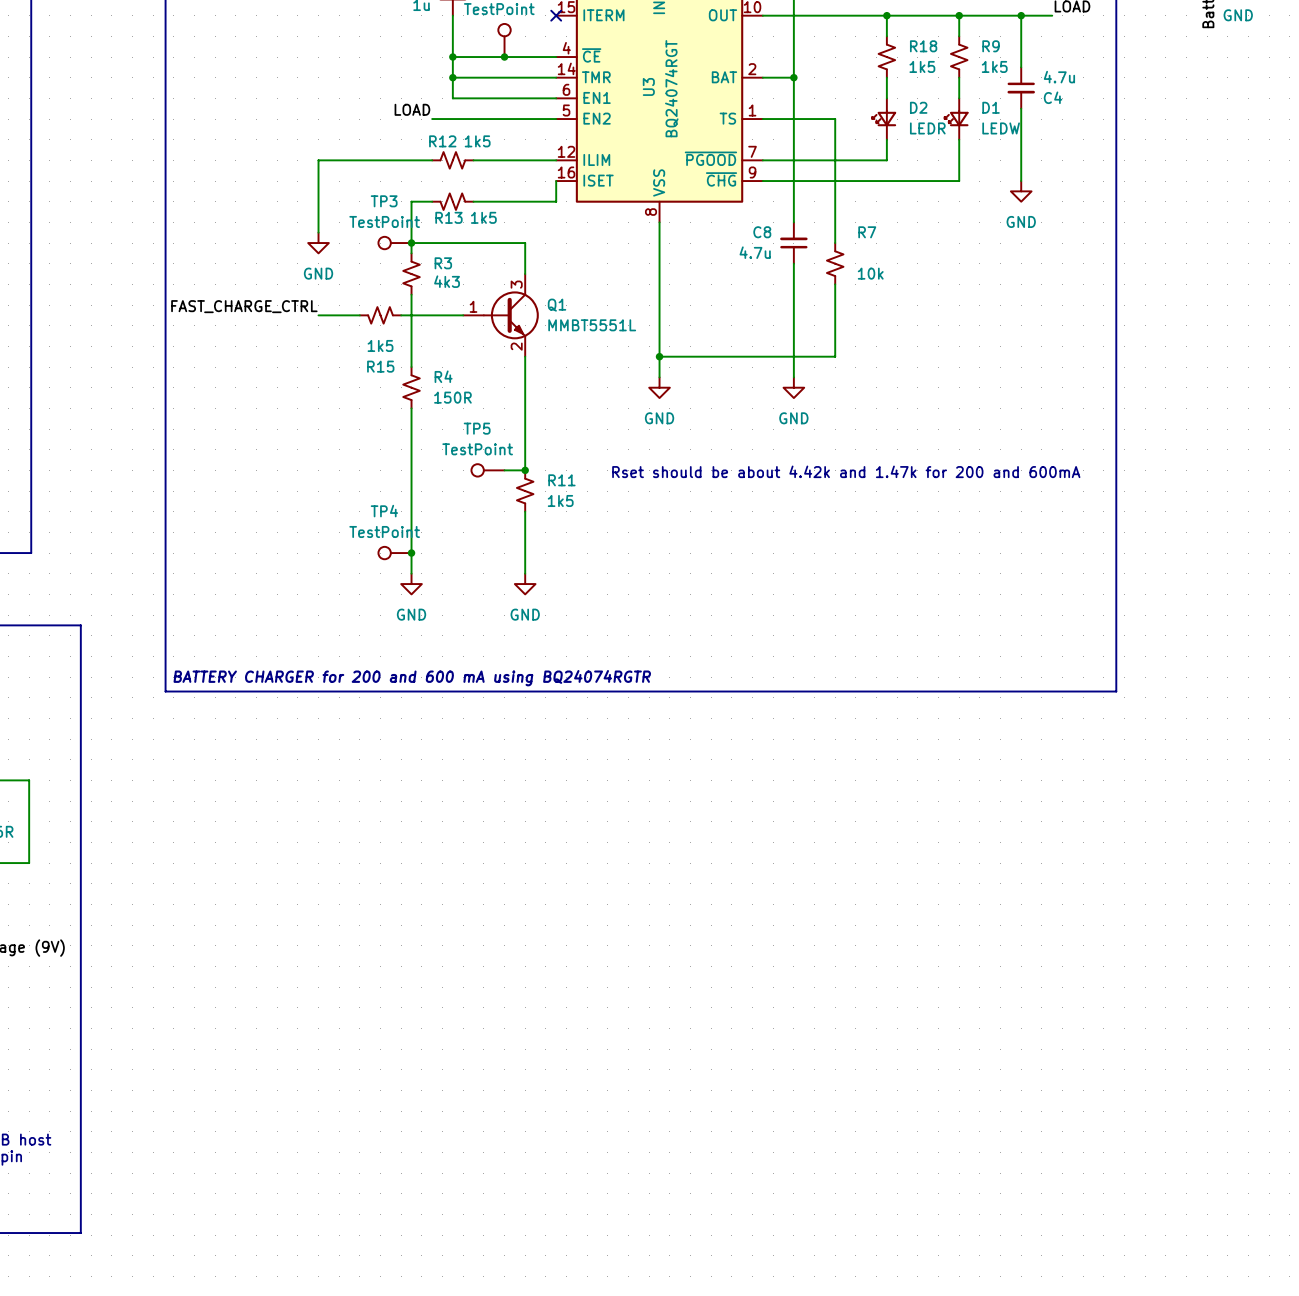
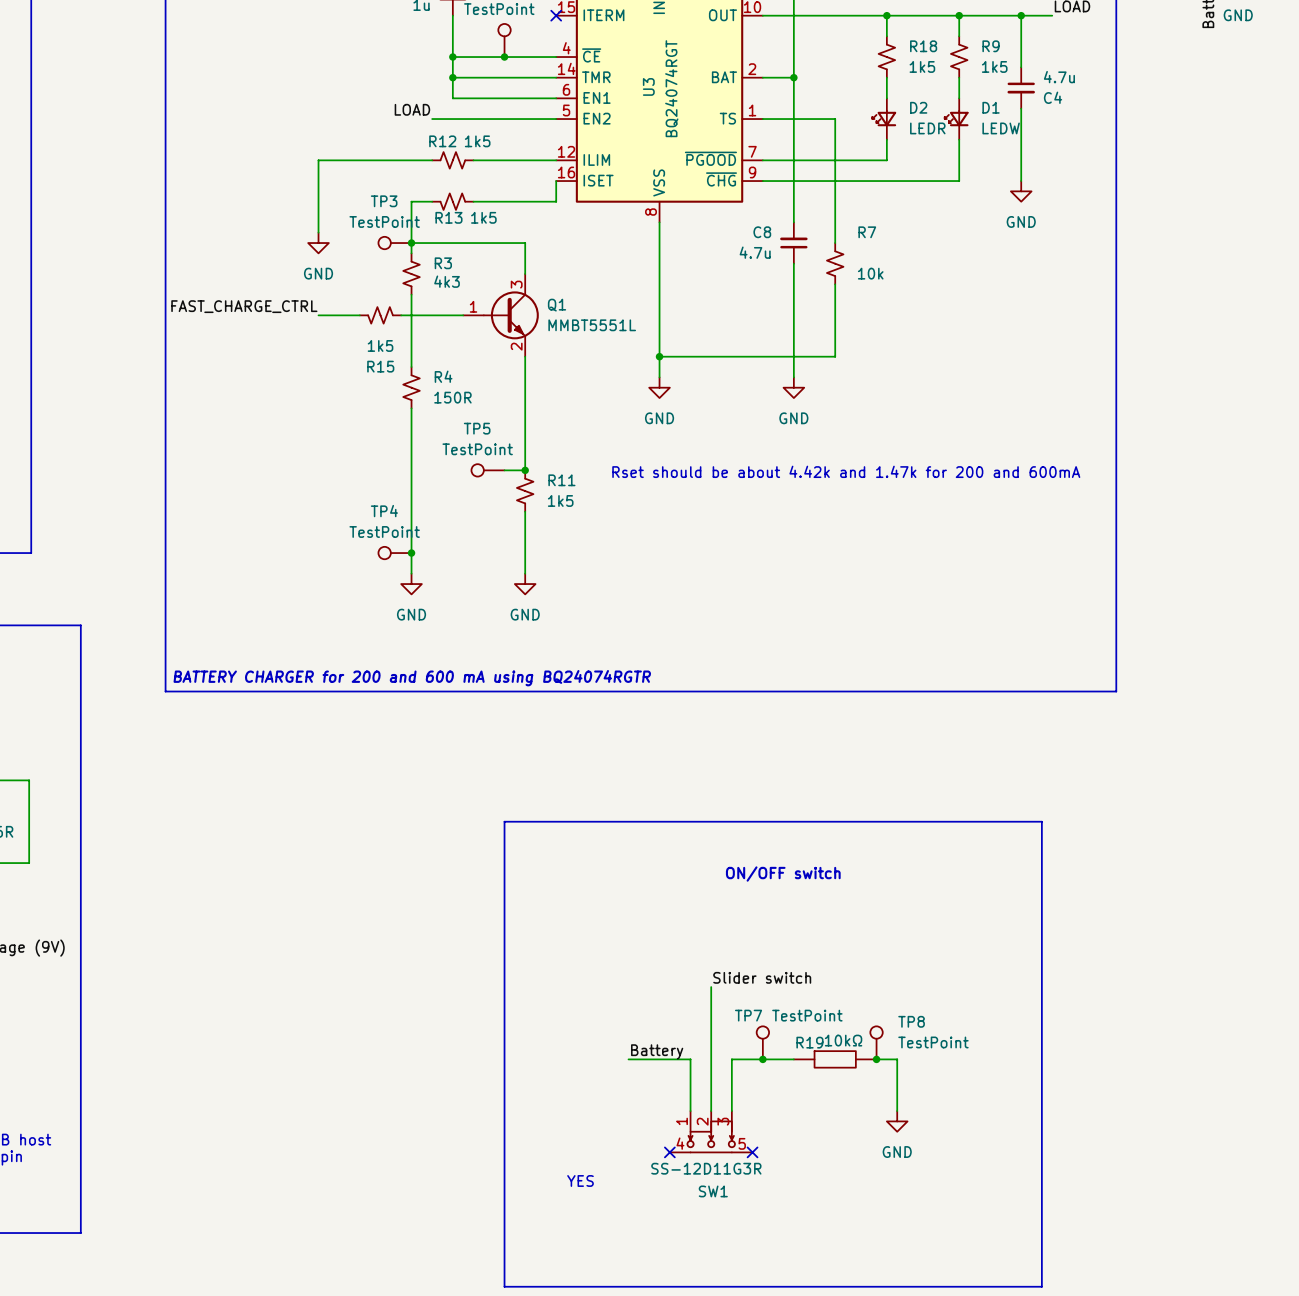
line: none -> (504, 821) (1041, 821) (1041, 1286) (504, 1286) (504, 821)
text: none -> ON/OFF switch (783, 874)
label: none -> Slider switch (762, 977)
wire: none -> (711, 987) (711, 1111)
TP7: none -> TestPoint (762, 1042)
TP8: none -> TestPoint (876, 1042)
label: none -> Battery (657, 1051)
wire: none -> (628, 1059) (690, 1059) (690, 1111)
junction: none -> (762, 1059)
wire: none -> (793, 1059) (731, 1059) (731, 1111)
R19: none -> 10kΩ (835, 1059)
wire: none -> (876, 1059) (897, 1059) (897, 1111)
junction: none -> (876, 1059)
power symbol: none -> GND (897, 1121)
SW1: none -> SS-12D11G3R (711, 1131)
no-connect mark: none -> (669, 1152)
no-connect mark: none -> (752, 1152)
text: none -> YES (580, 1180)

